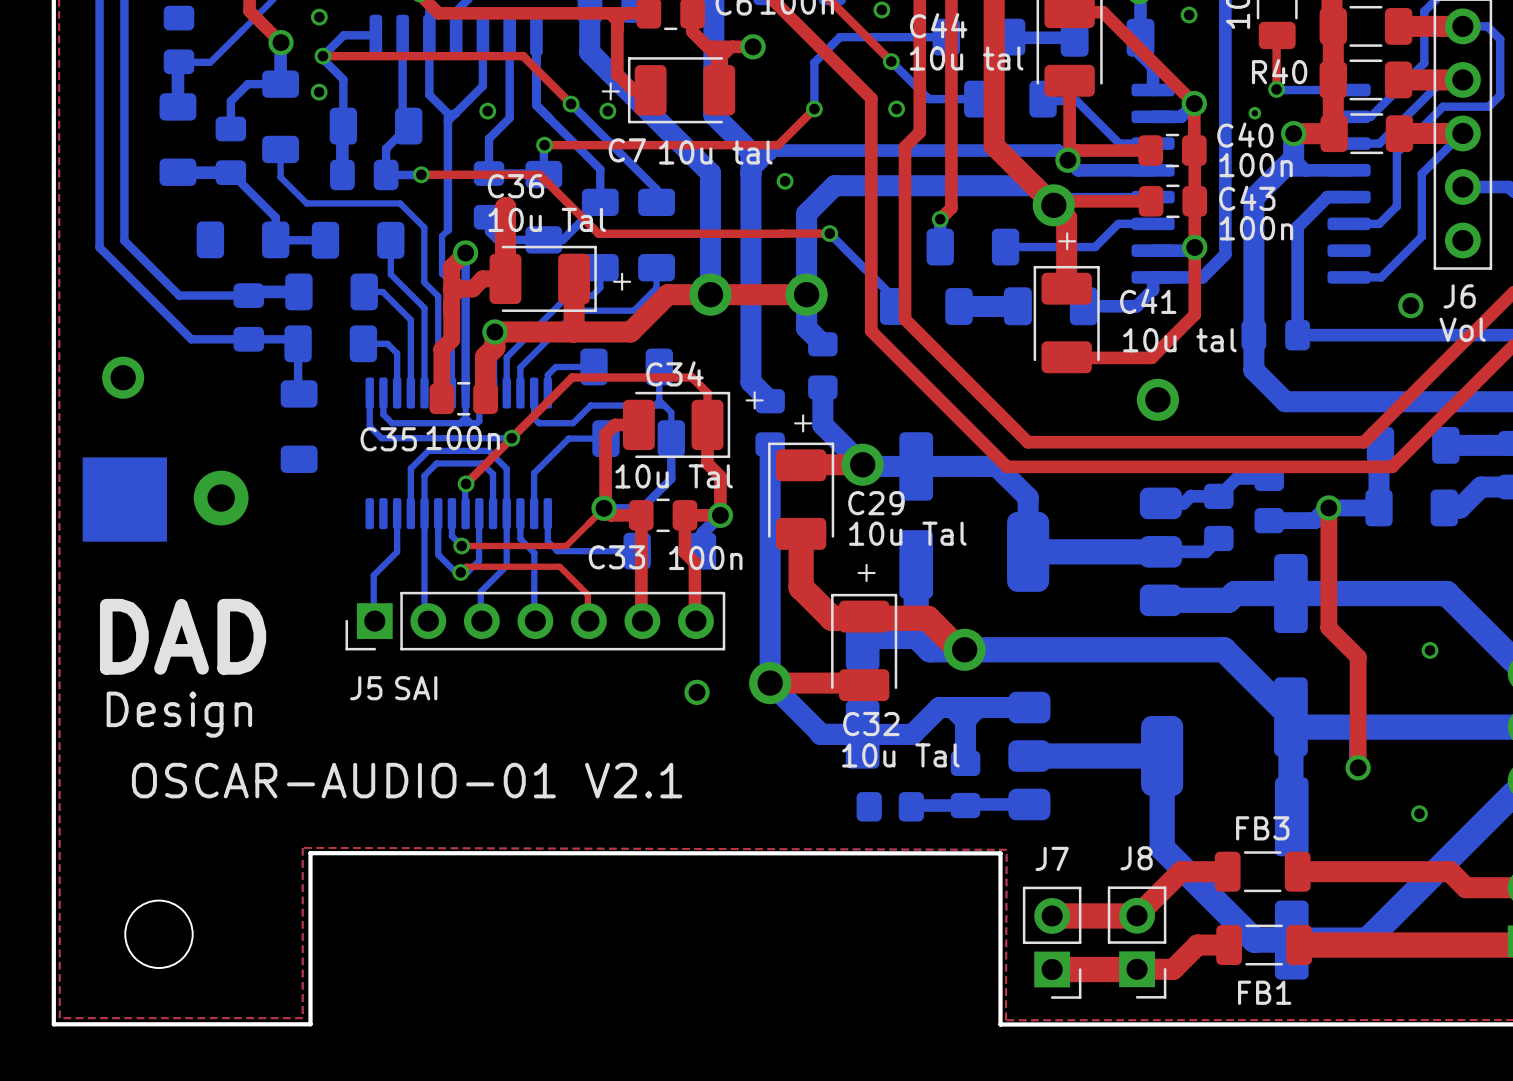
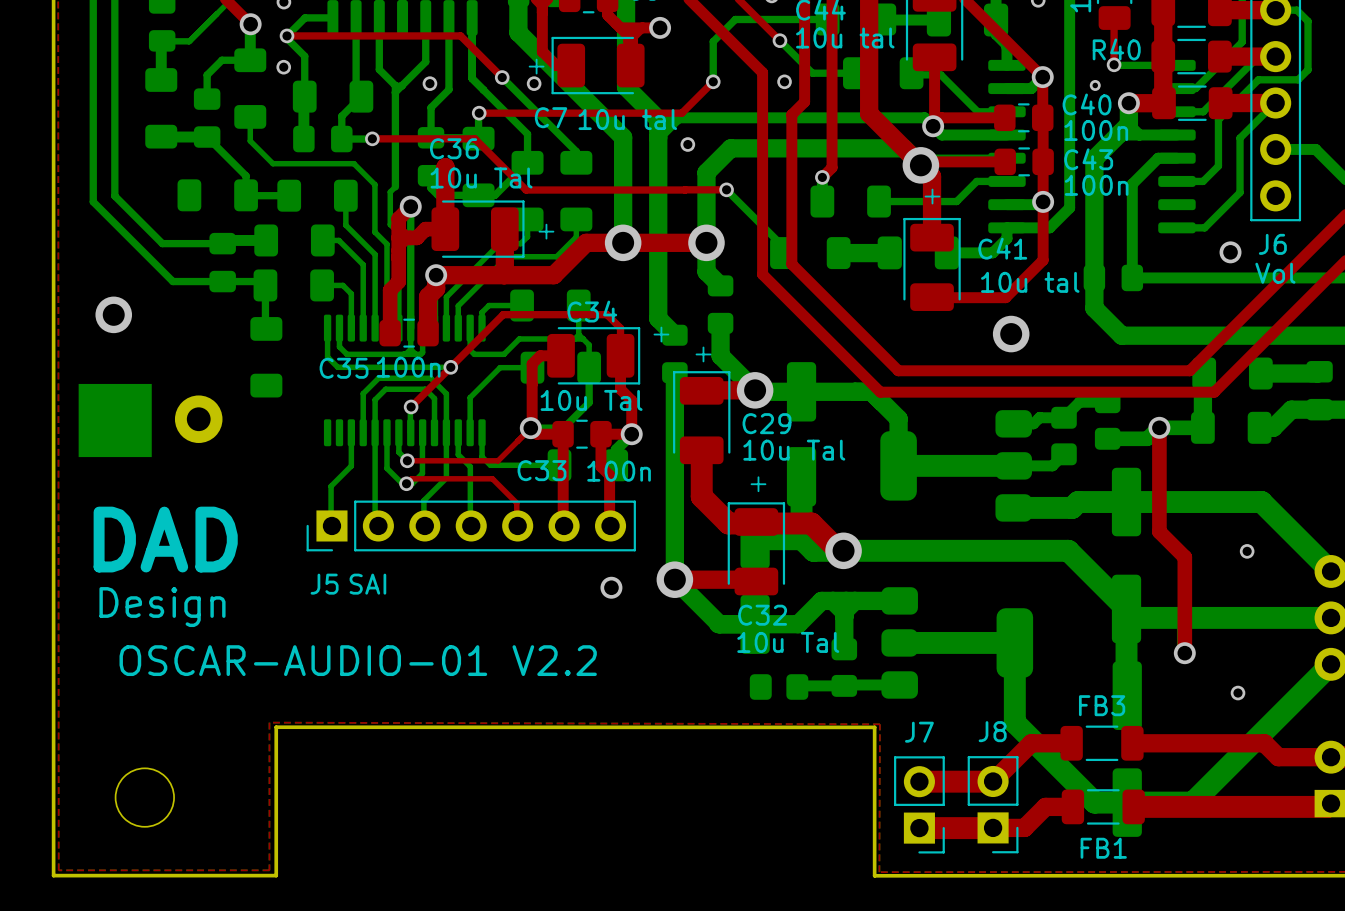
text: OSCAR-AUDIO-01 V2.1 (407, 780) -> OSCAR-AUDIO-01 V2.2 (358, 660)

